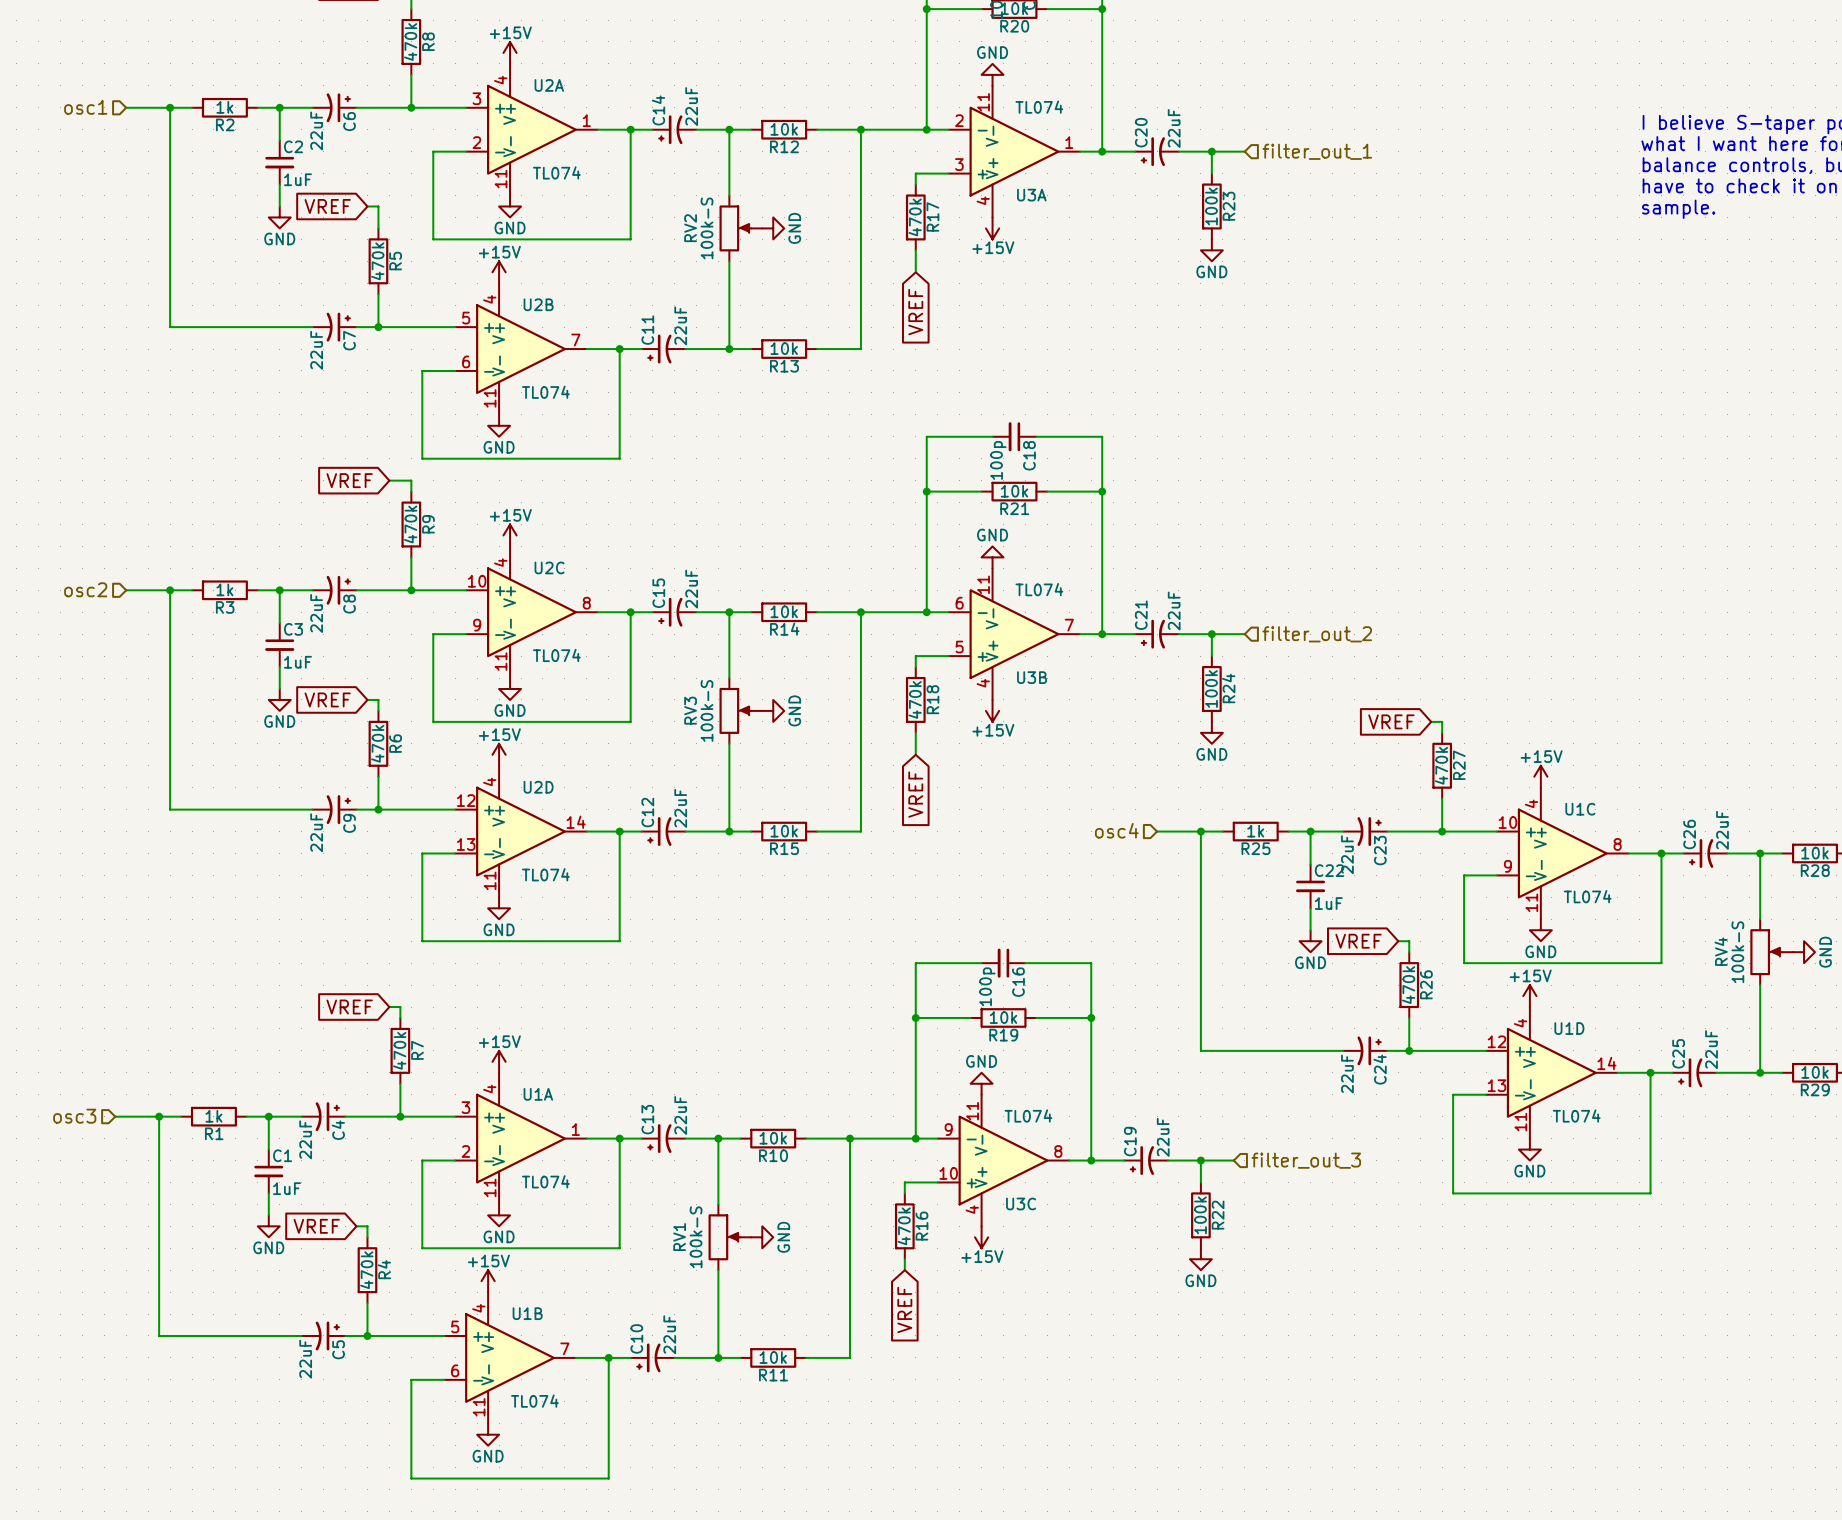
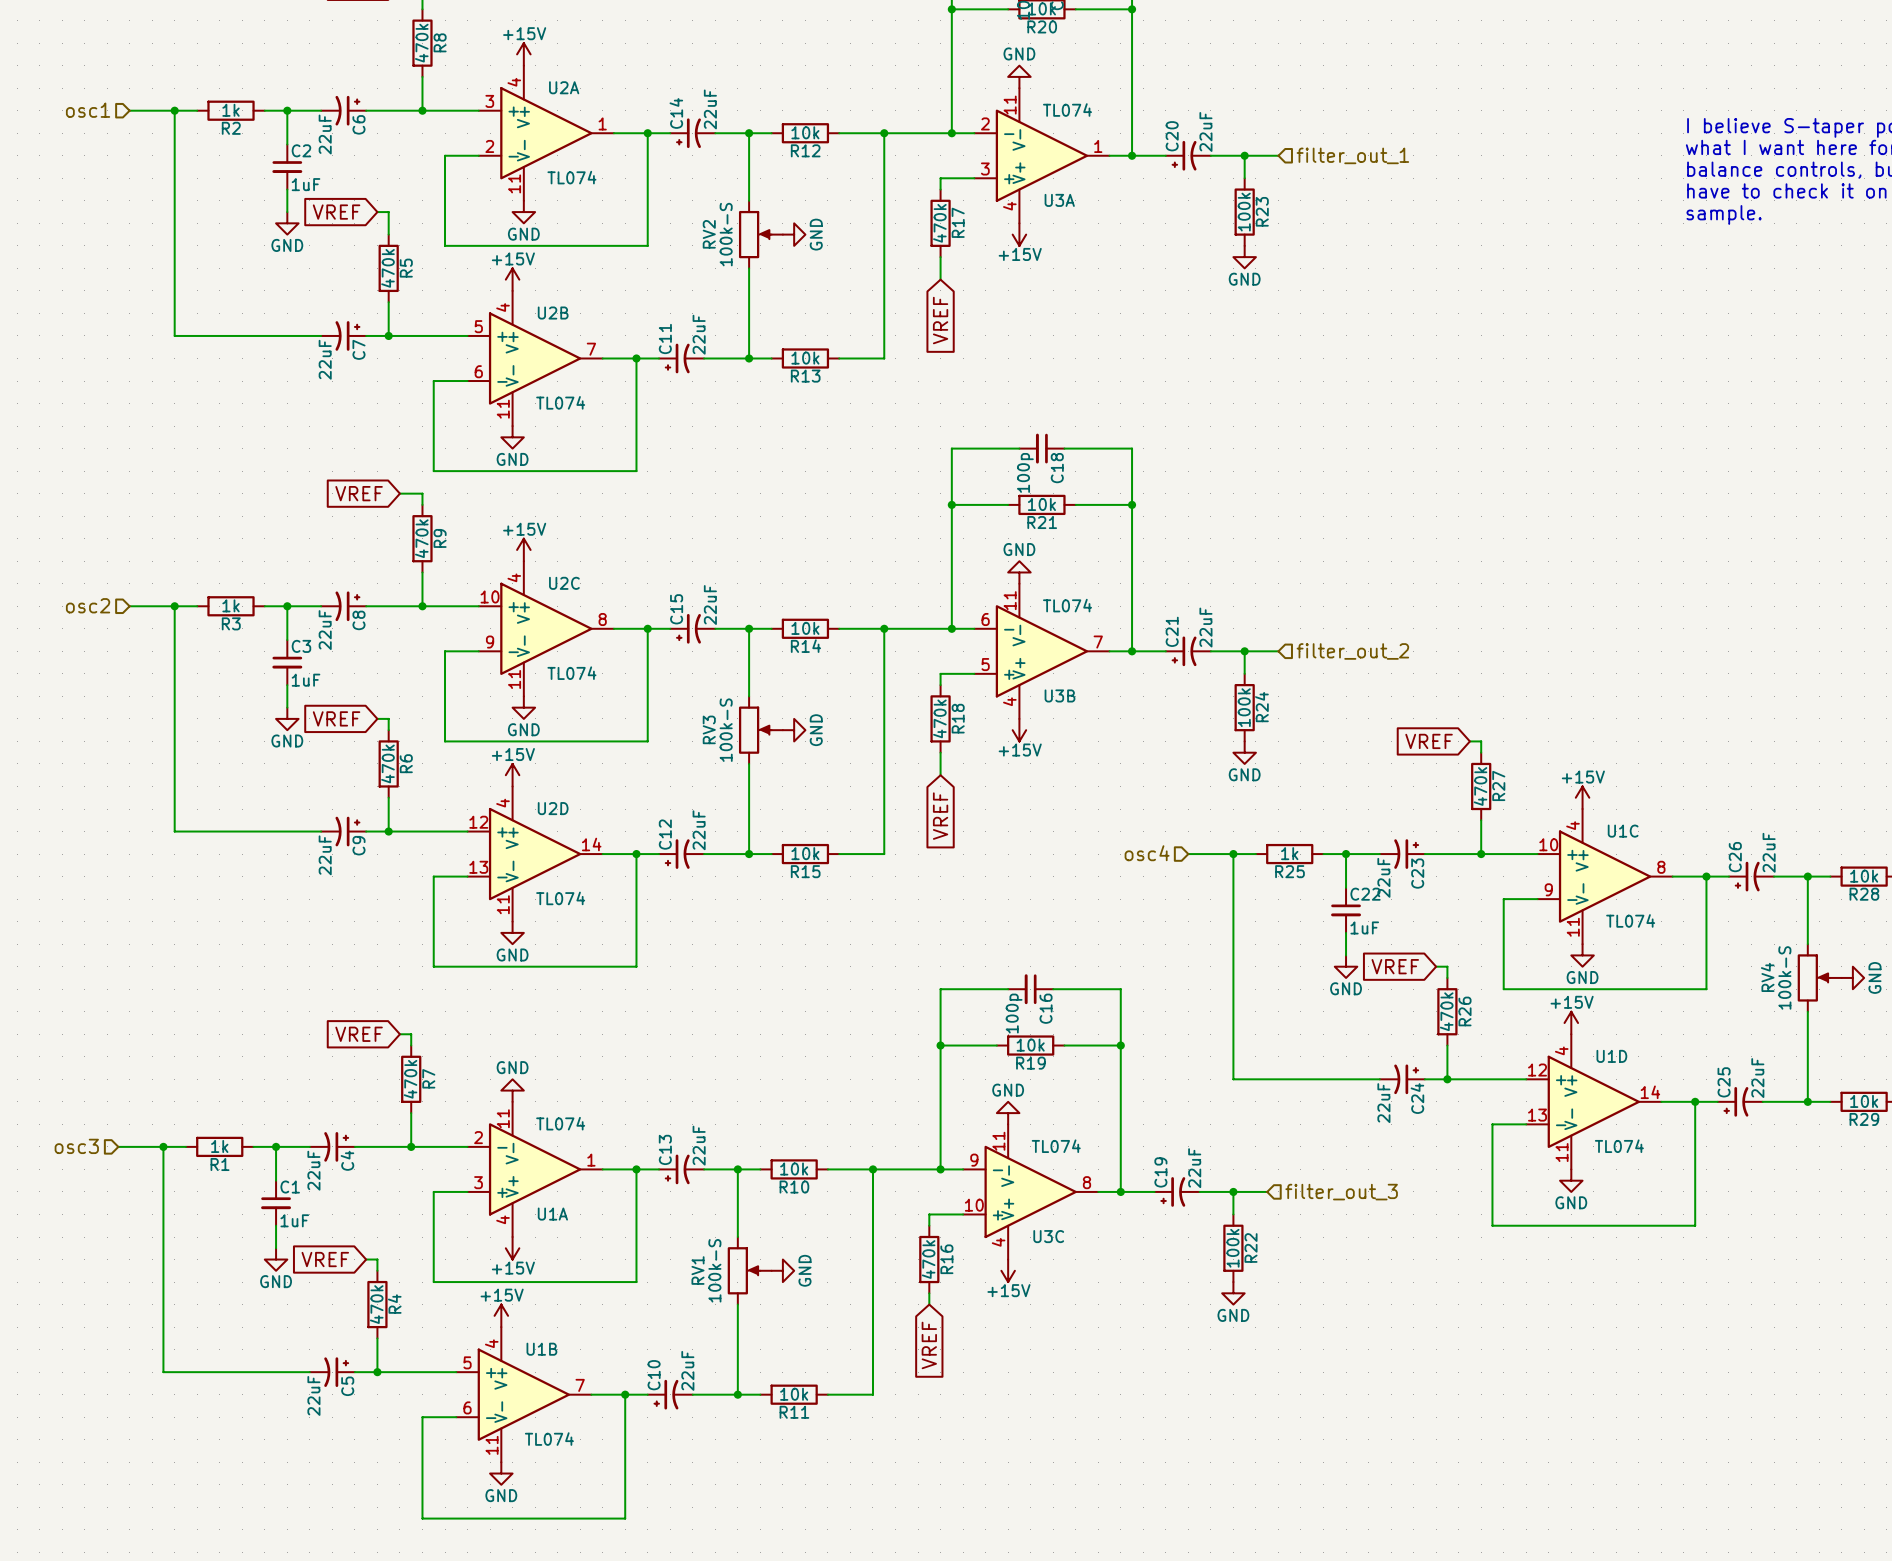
power symbol: +15V (499, 1061) -> GND (512, 1090)
U1A flip: as is (521, 1138) -> up-down (535, 1169)
power symbol: GND (499, 1215) -> +15V (512, 1248)

